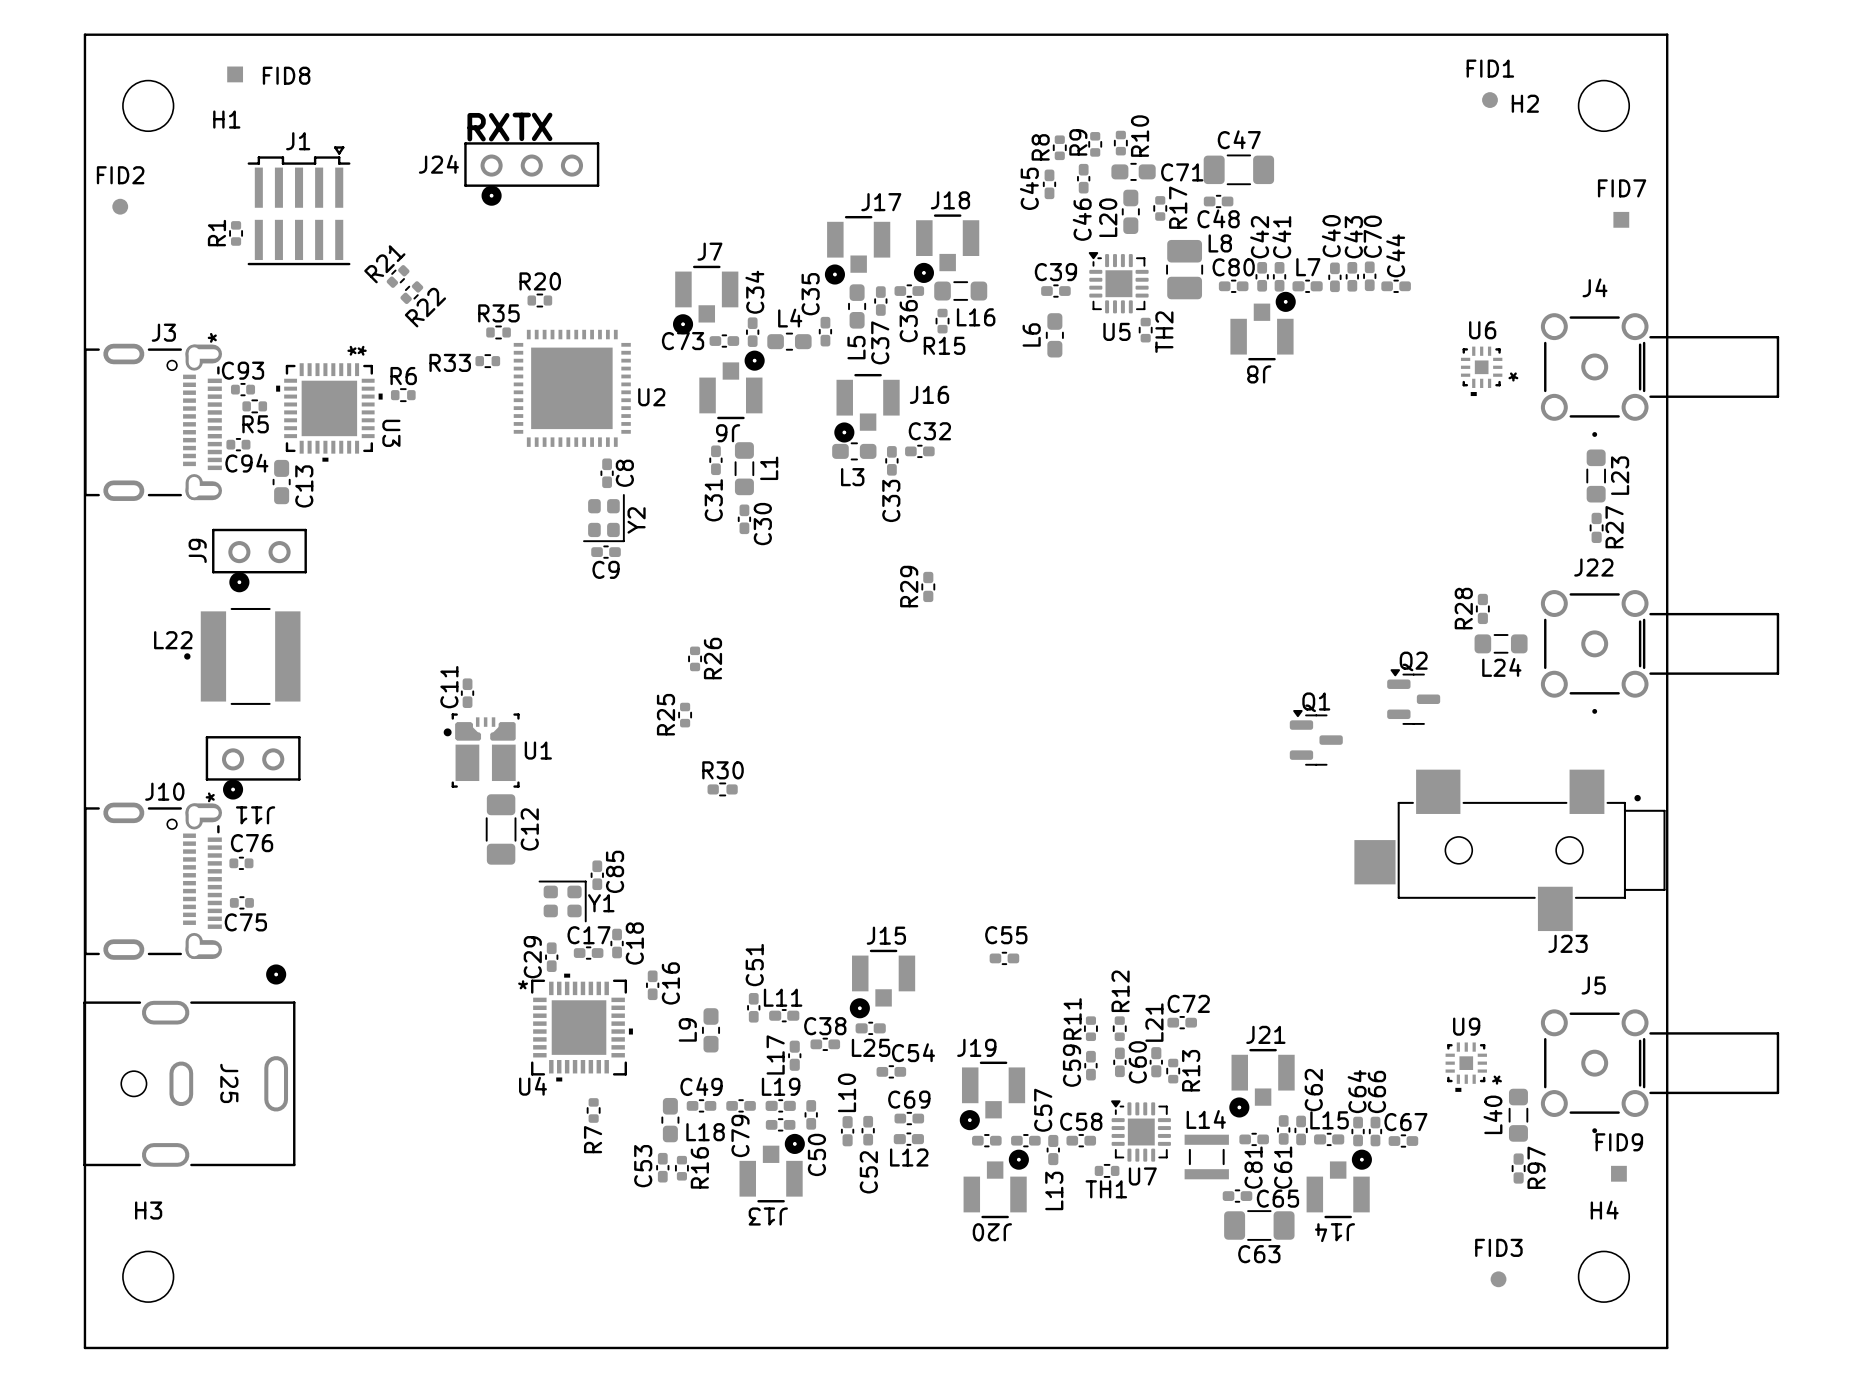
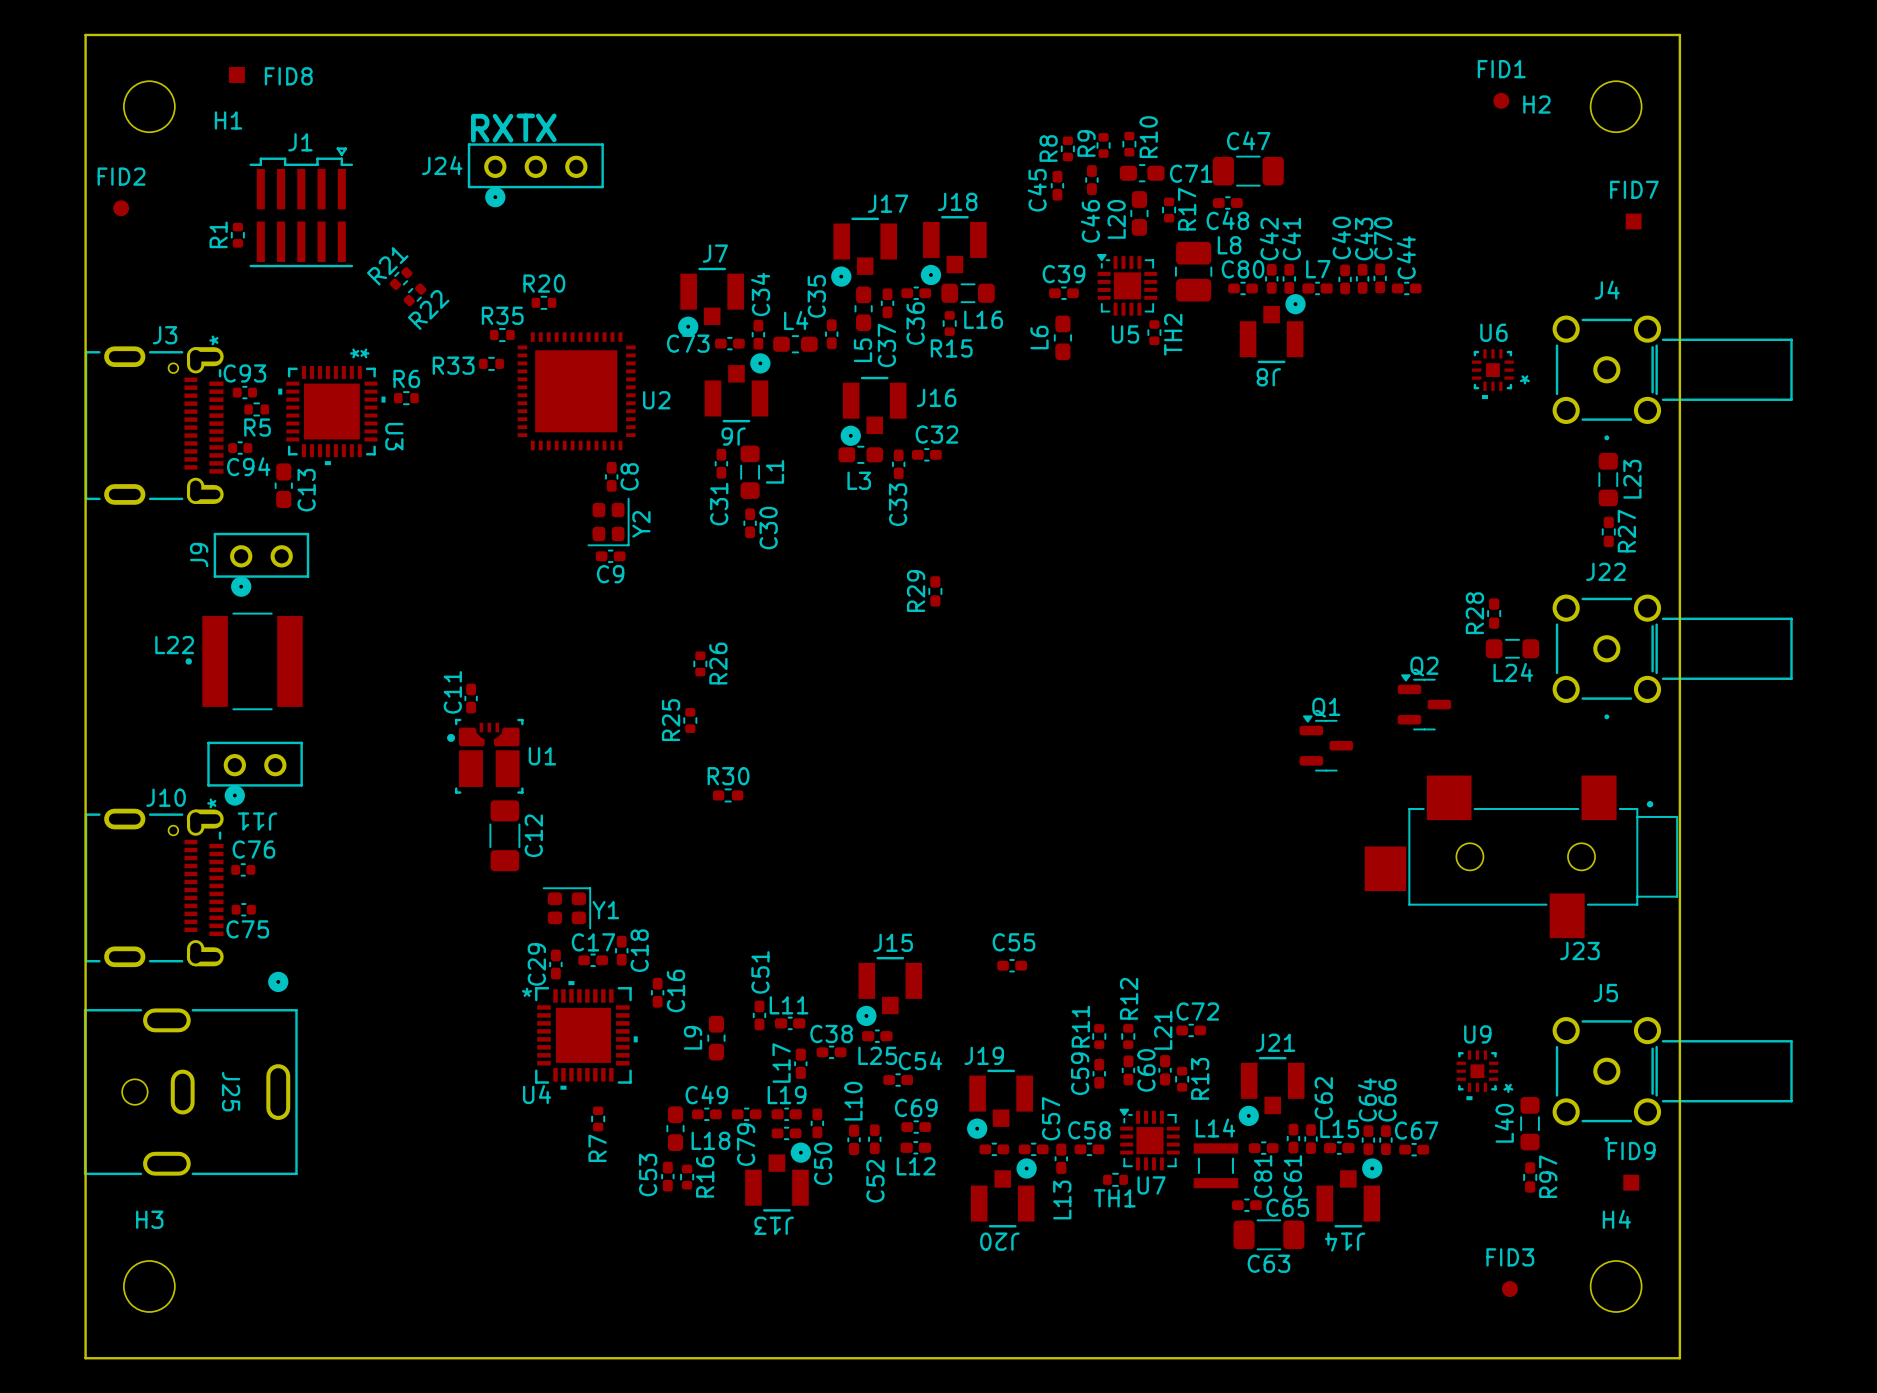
C85: (597, 875) -> none

